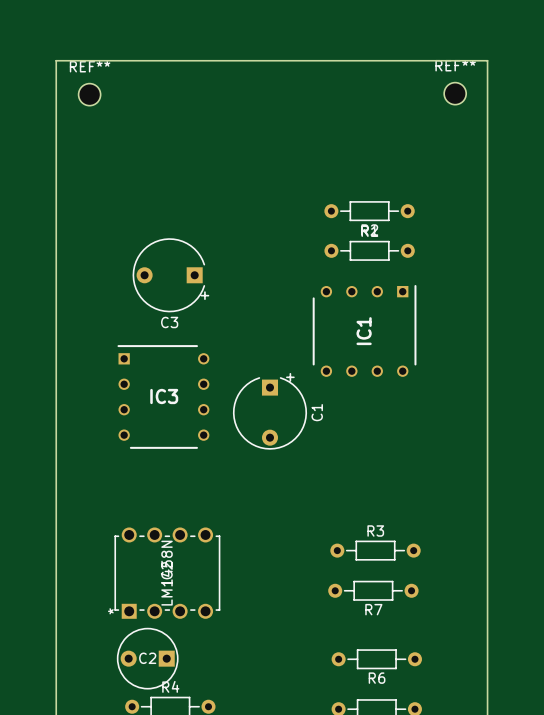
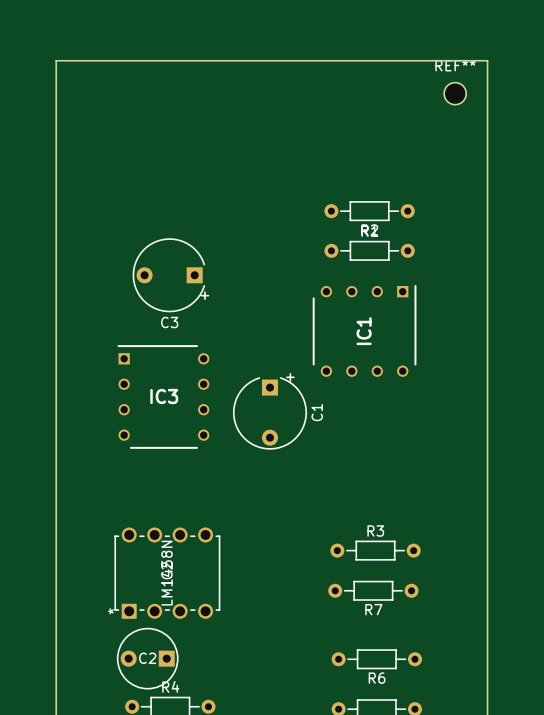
REF**: (89, 94) -> none

